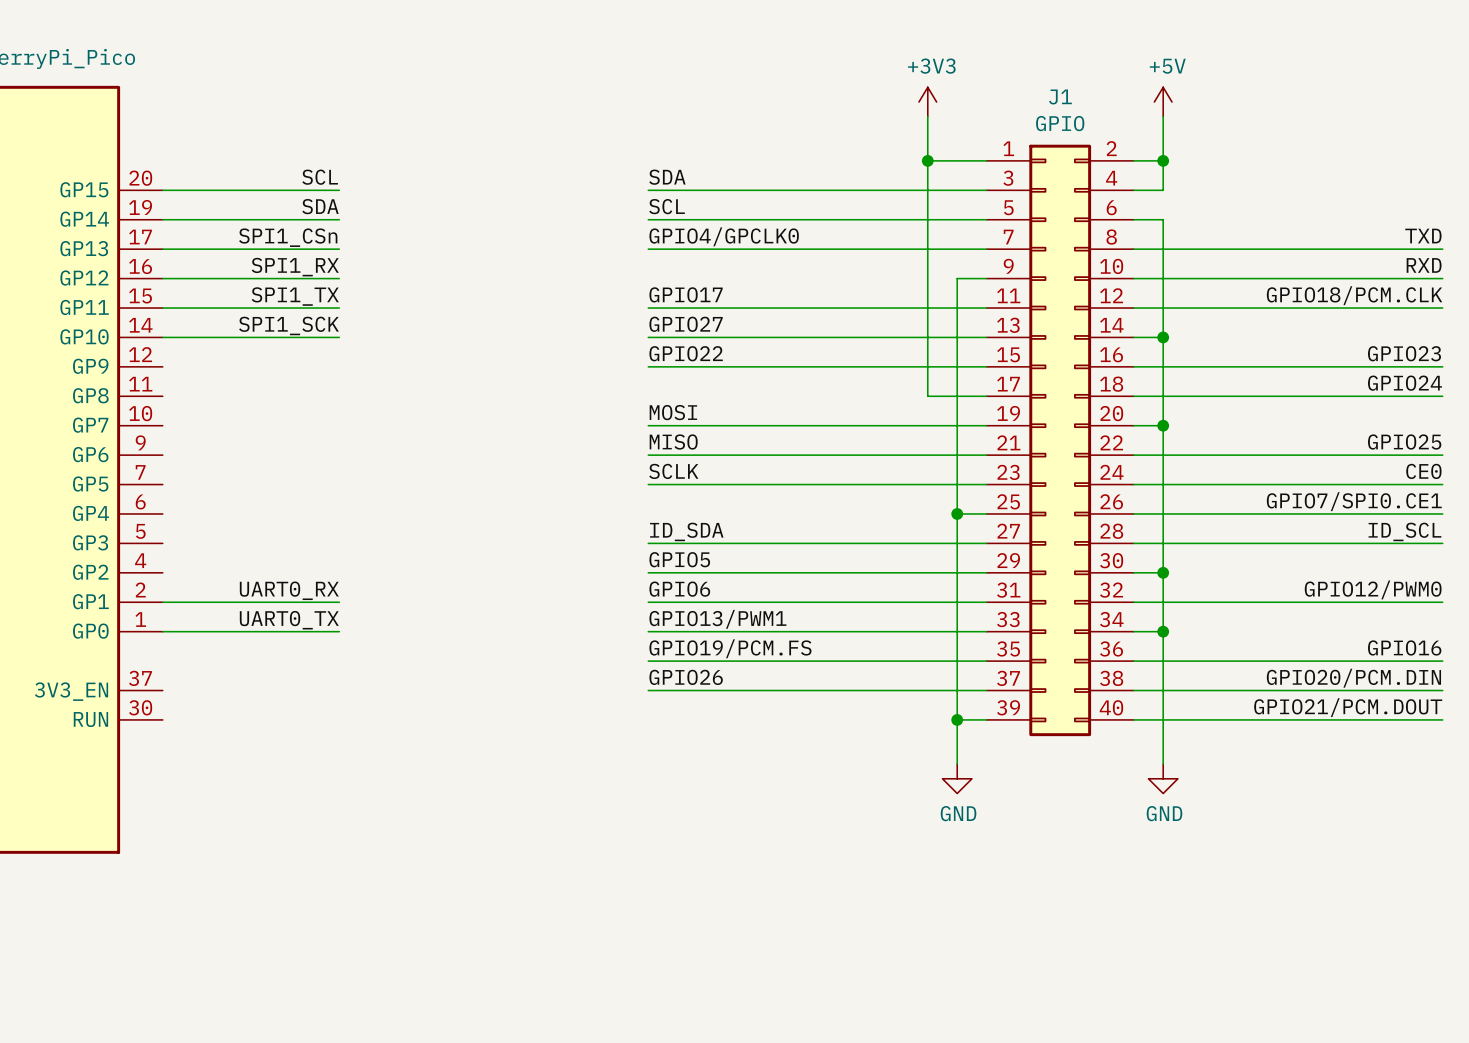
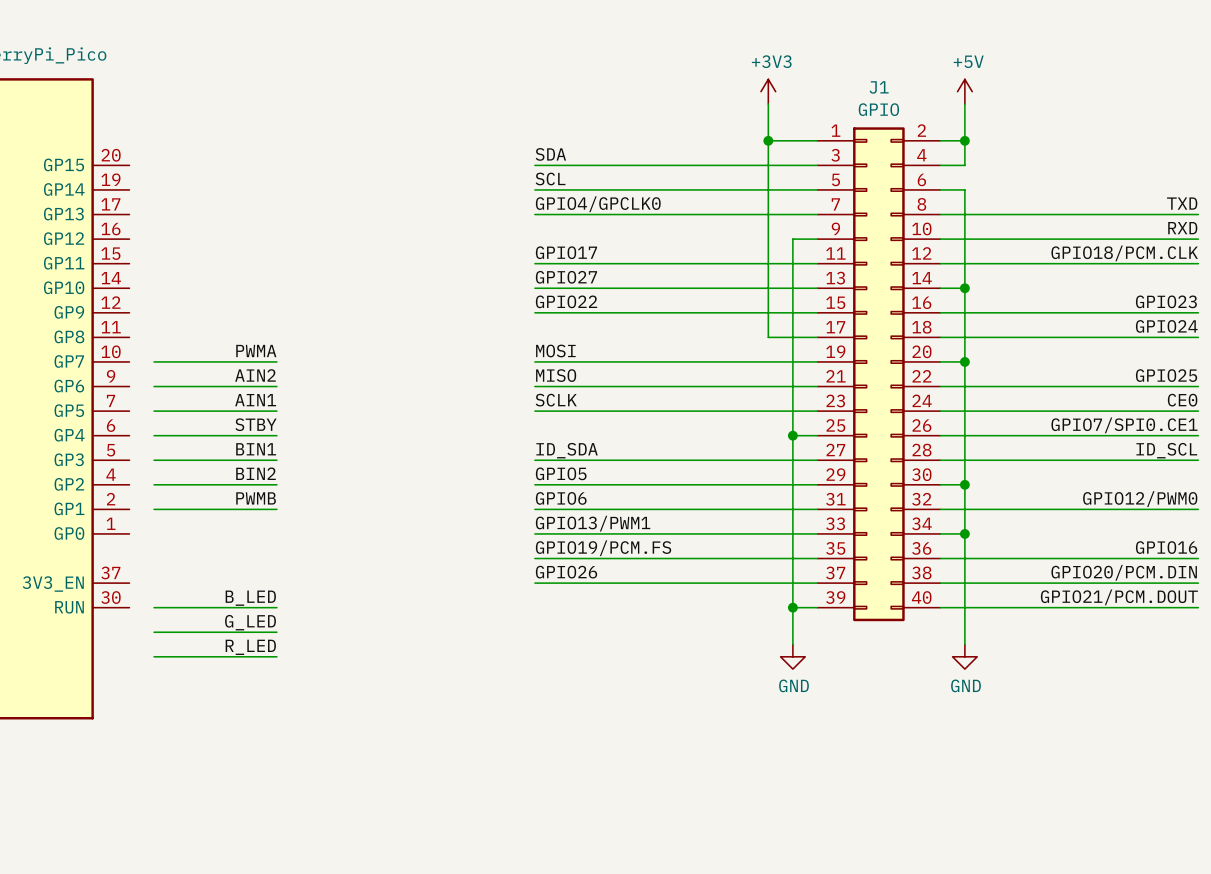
label: SCL (320, 177) -> none
wire: (162, 190) (339, 190) -> none
label: SDA (320, 206) -> none
wire: (162, 219) (339, 219) -> none
label: SPI1_CSn (288, 237) -> none
wire: (162, 249) (339, 249) -> none
label: SPI1_RX (295, 267) -> none
wire: (162, 278) (339, 278) -> none
label: SPI1_TX (295, 296) -> none
wire: (162, 308) (339, 308) -> none
label: SPI1_SCK (288, 325) -> none
wire: (162, 337) (339, 337) -> none
label: none -> PWMA (256, 351)
wire: none -> (154, 361) (276, 361)
label: none -> AIN2 (255, 375)
wire: none -> (154, 386) (276, 386)
label: none -> AIN1 (255, 400)
wire: none -> (154, 411) (276, 411)
label: none -> STBY (256, 424)
wire: none -> (154, 435) (276, 435)
label: none -> BIN1 (256, 449)
wire: none -> (154, 460) (276, 460)
label: none -> BIN2 (256, 473)
wire: none -> (154, 484) (276, 484)
label: UART0_RX (289, 590) -> PWMB (256, 498)
wire: (162, 602) (192, 602) -> none
label: UART0_TX (289, 620) -> none
wire: (162, 631) (339, 631) -> none
label: none -> B_LED (250, 598)
wire: none -> (154, 607) (276, 607)
label: none -> G_LED (250, 622)
wire: none -> (154, 632) (276, 632)
label: none -> R_LED (250, 647)
wire: none -> (154, 656) (276, 656)

